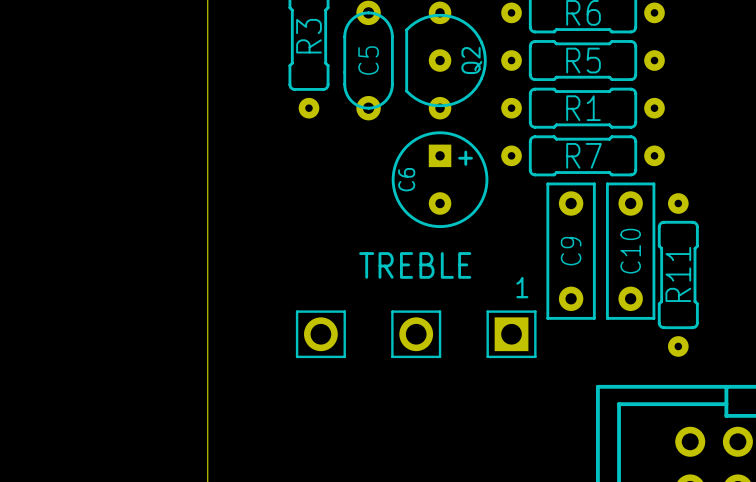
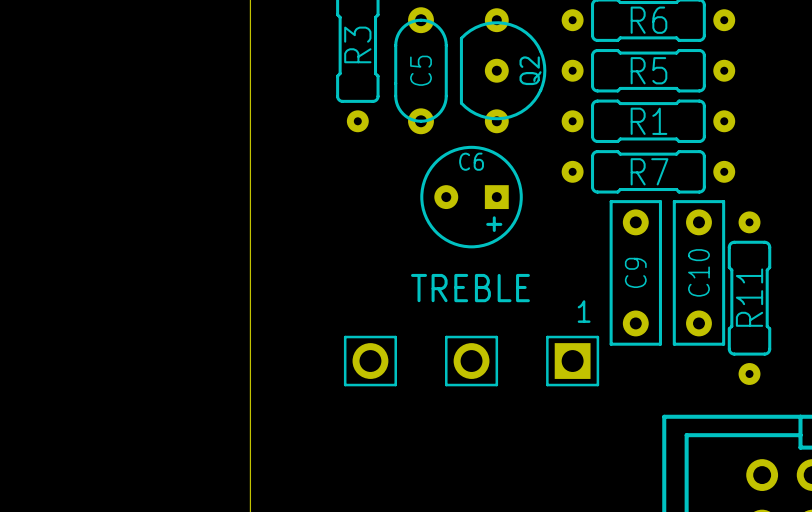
C6 rotation: 0° (440, 179) -> 90° clockwise (471, 197)

